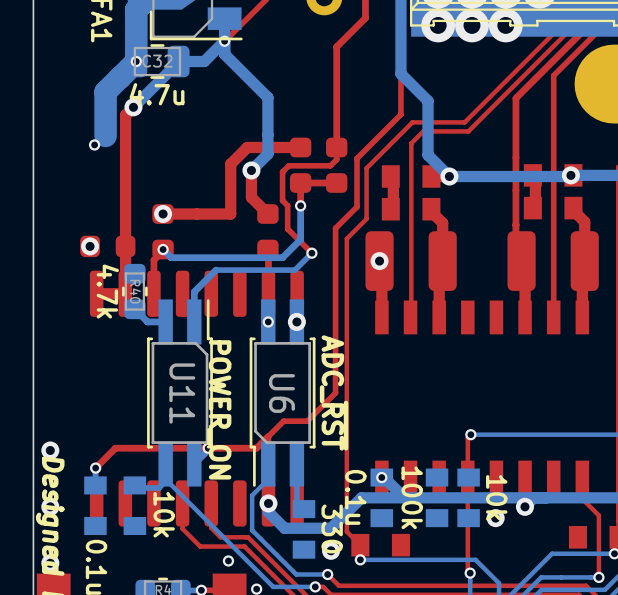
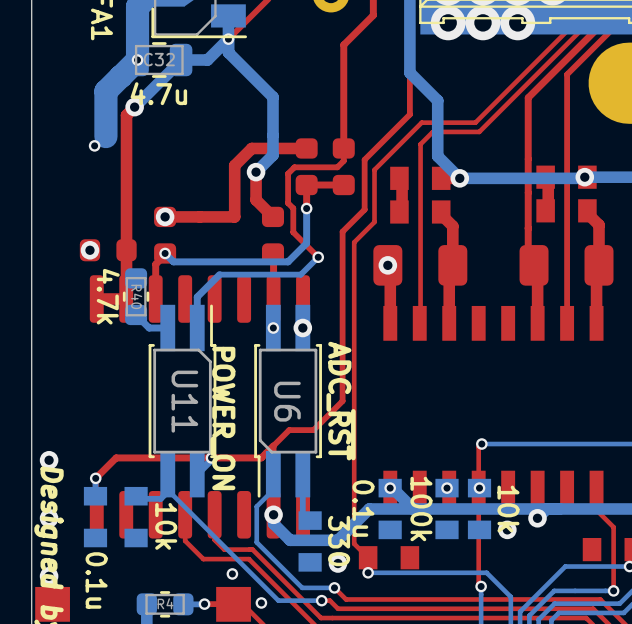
part footprint: [365, 231, 457, 291] -> [373, 245, 468, 286]
part footprint: [507, 231, 599, 291] -> [519, 245, 614, 286]
via: none -> (447, 488)
via: none -> (479, 488)

